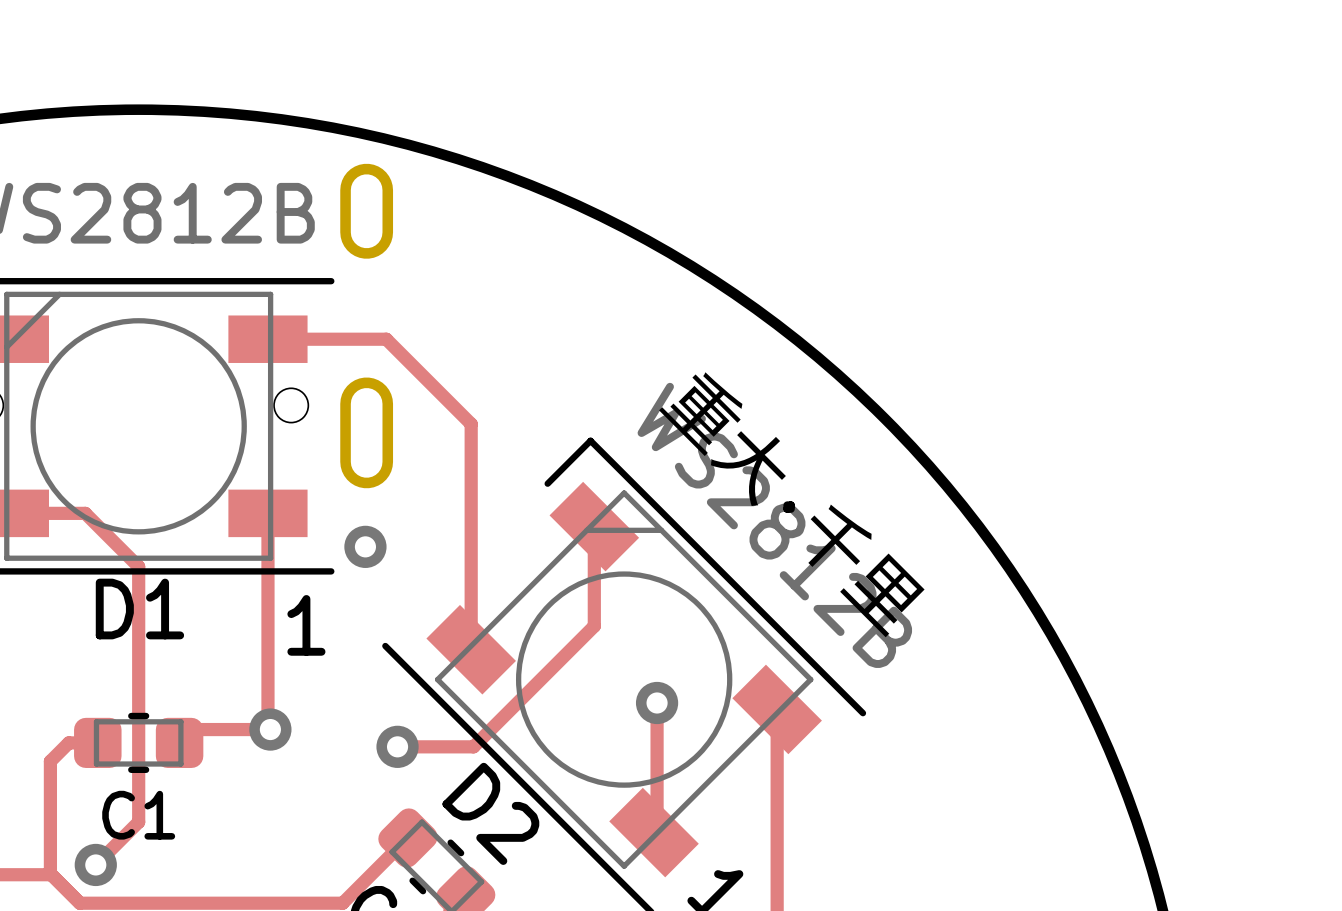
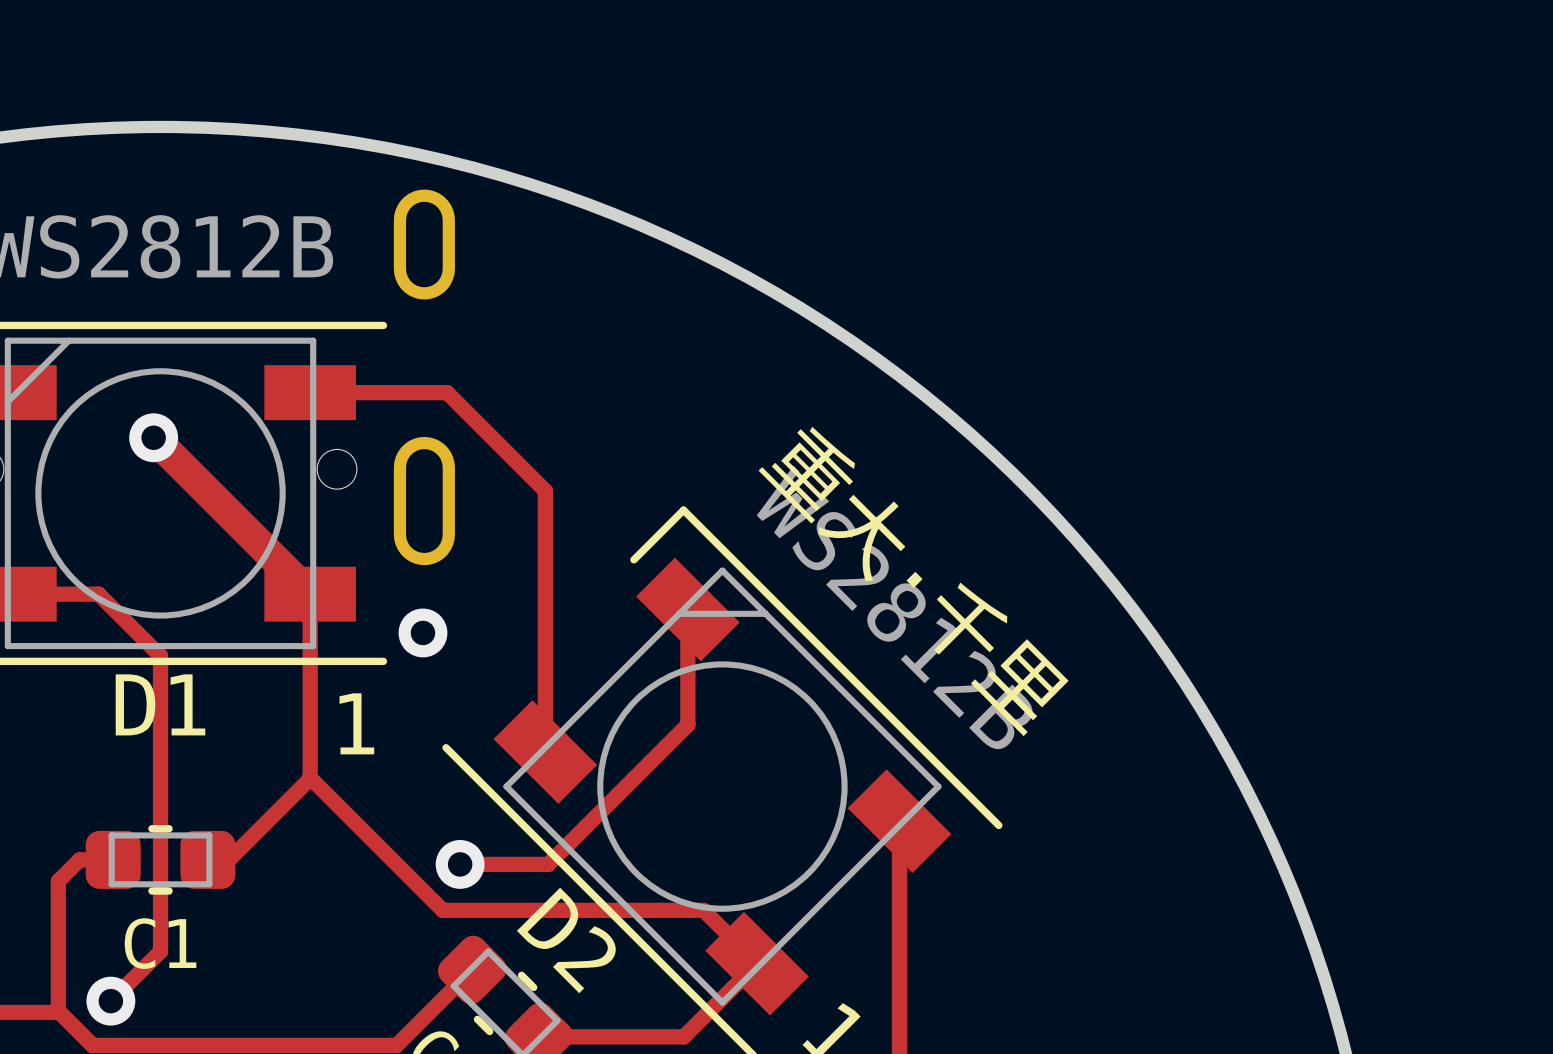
track: none -> (153, 437) (310, 594)
via: none -> (153, 437)
track: none -> (310, 777) (442, 910) (703, 910) (756, 963) (683, 1036) (539, 1036)
track: (267, 672) (267, 727) (270, 729) (192, 729) (179, 742) -> (310, 778) (228, 859) (207, 859)
track: (657, 702) (657, 829) -> none
via: (657, 702) -> none
via: (270, 729) -> none

